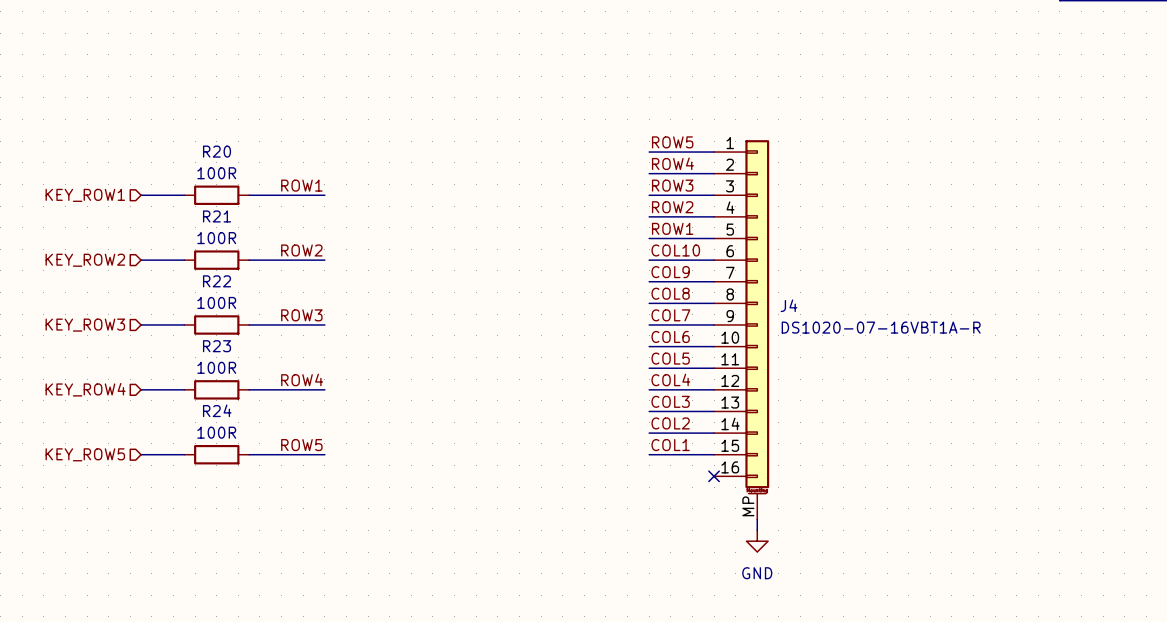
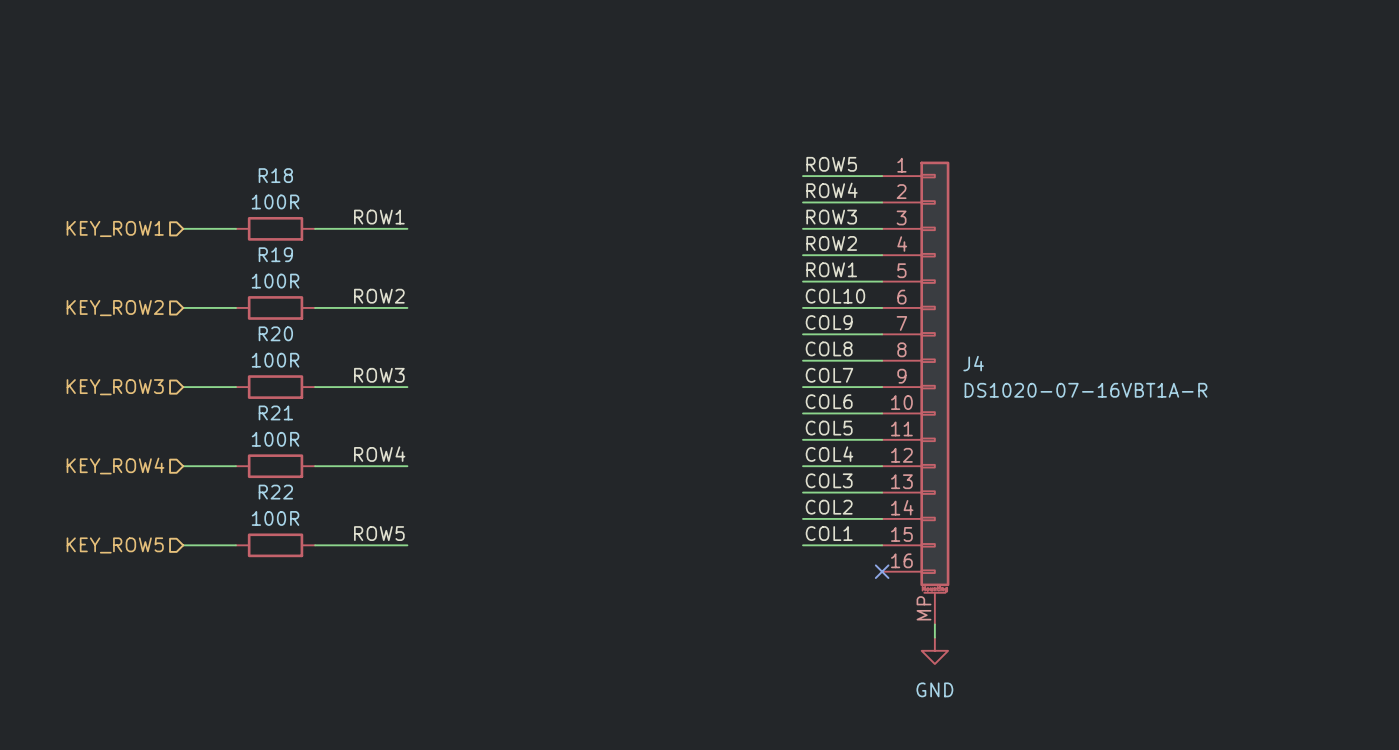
R20 name: R20 (217, 151) -> R18 (275, 175)
R21 name: R21 (217, 216) -> R19 (275, 254)
R22 name: R22 (217, 281) -> R20 (275, 333)
R23 name: R23 (217, 346) -> R21 (275, 412)
R24 name: R24 (217, 410) -> R22 (275, 492)

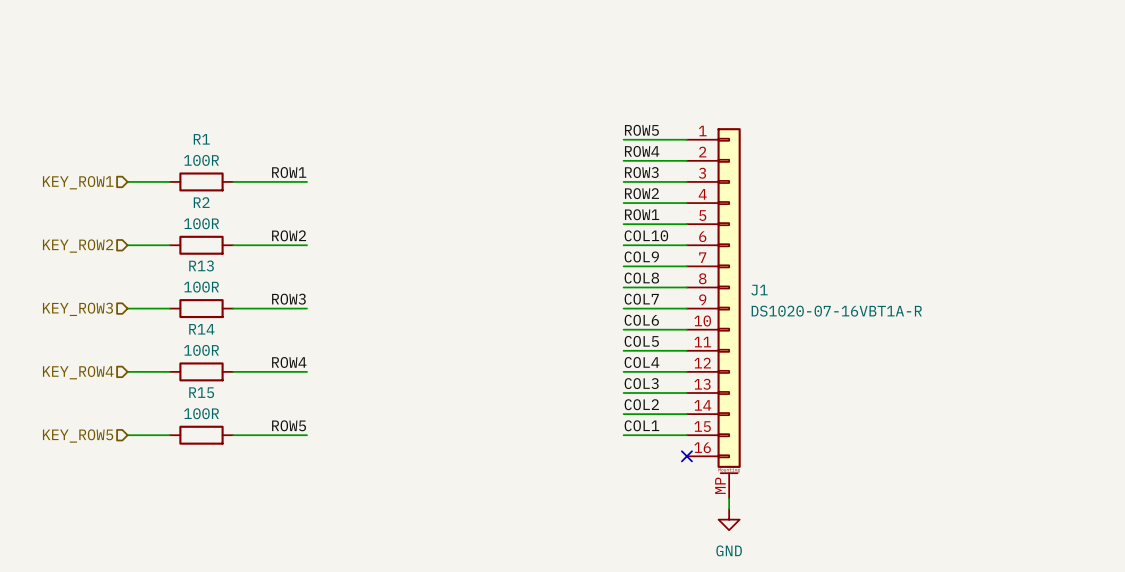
R18 name: R18 (275, 175) -> R1 (201, 139)
R19 name: R19 (275, 254) -> R2 (201, 202)
R20 name: R20 (275, 333) -> R13 (201, 265)
J4 name: J4 (973, 363) -> J1 (759, 290)
R21 name: R21 (275, 412) -> R14 (201, 329)
R22 name: R22 (275, 492) -> R15 (201, 392)

